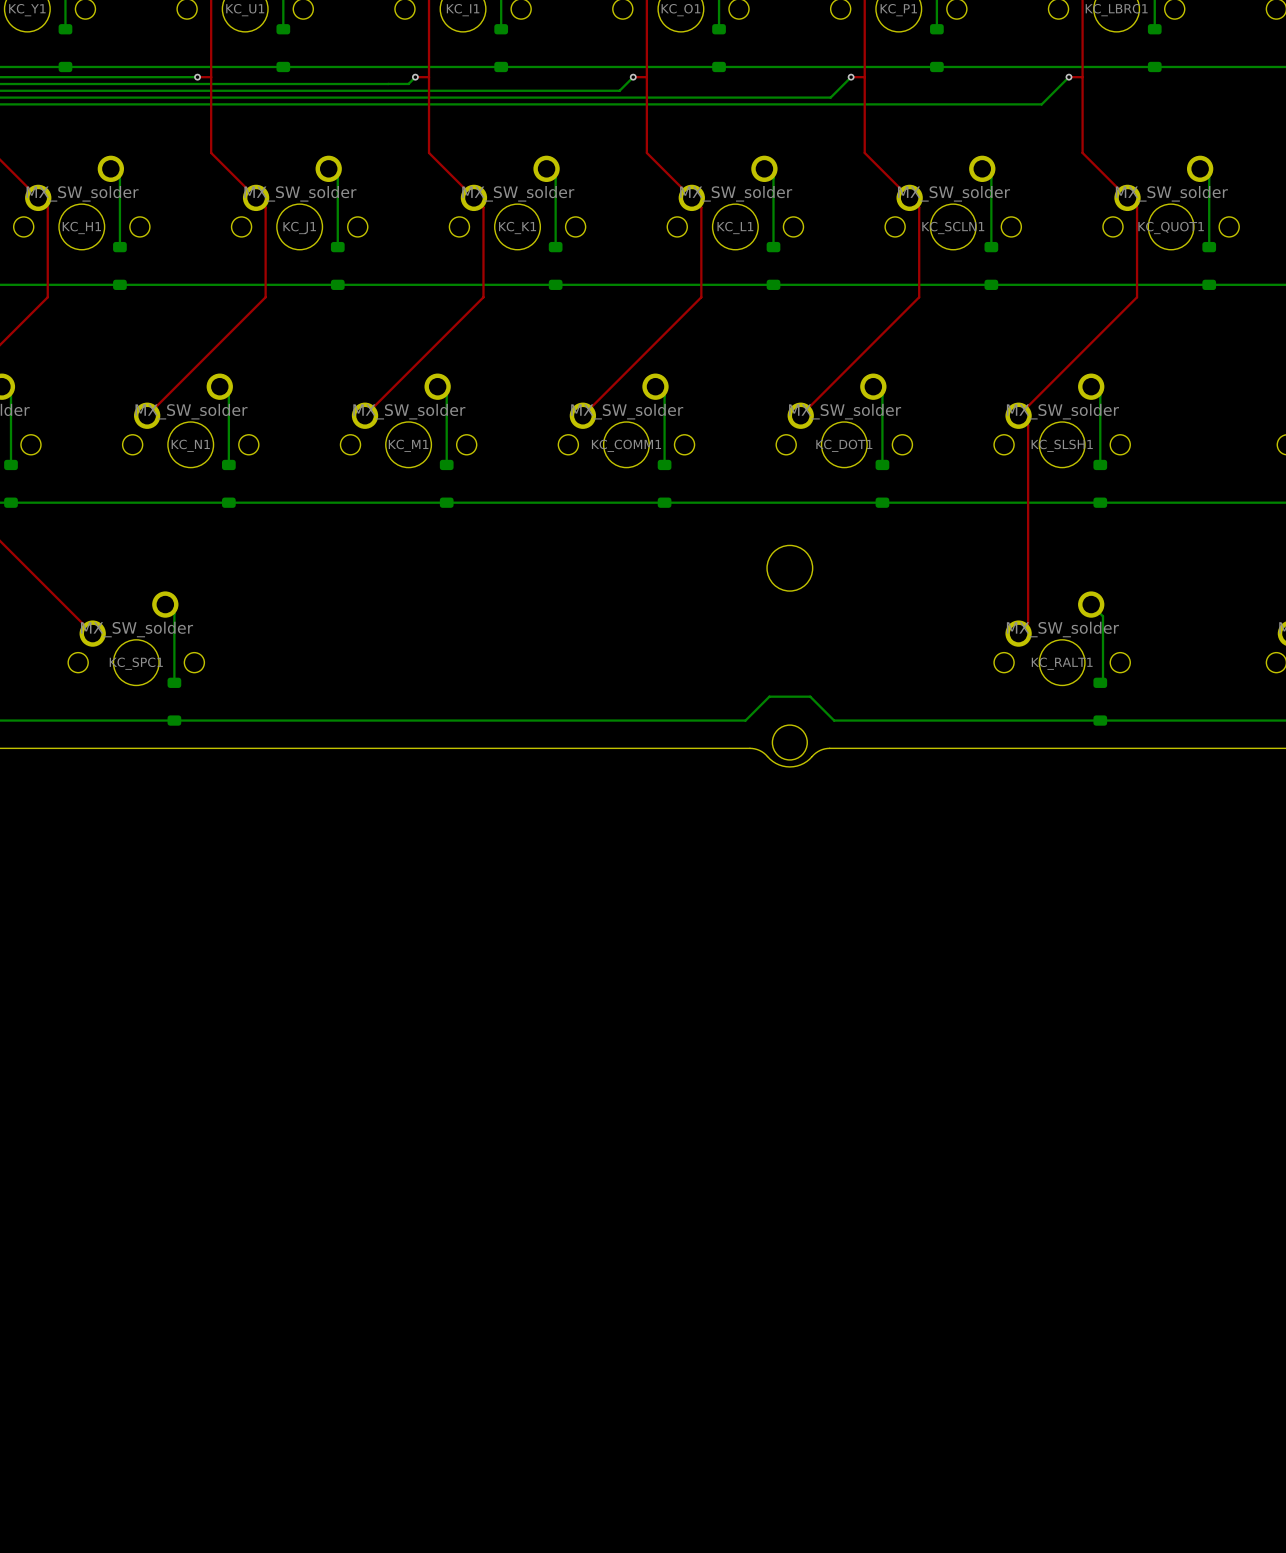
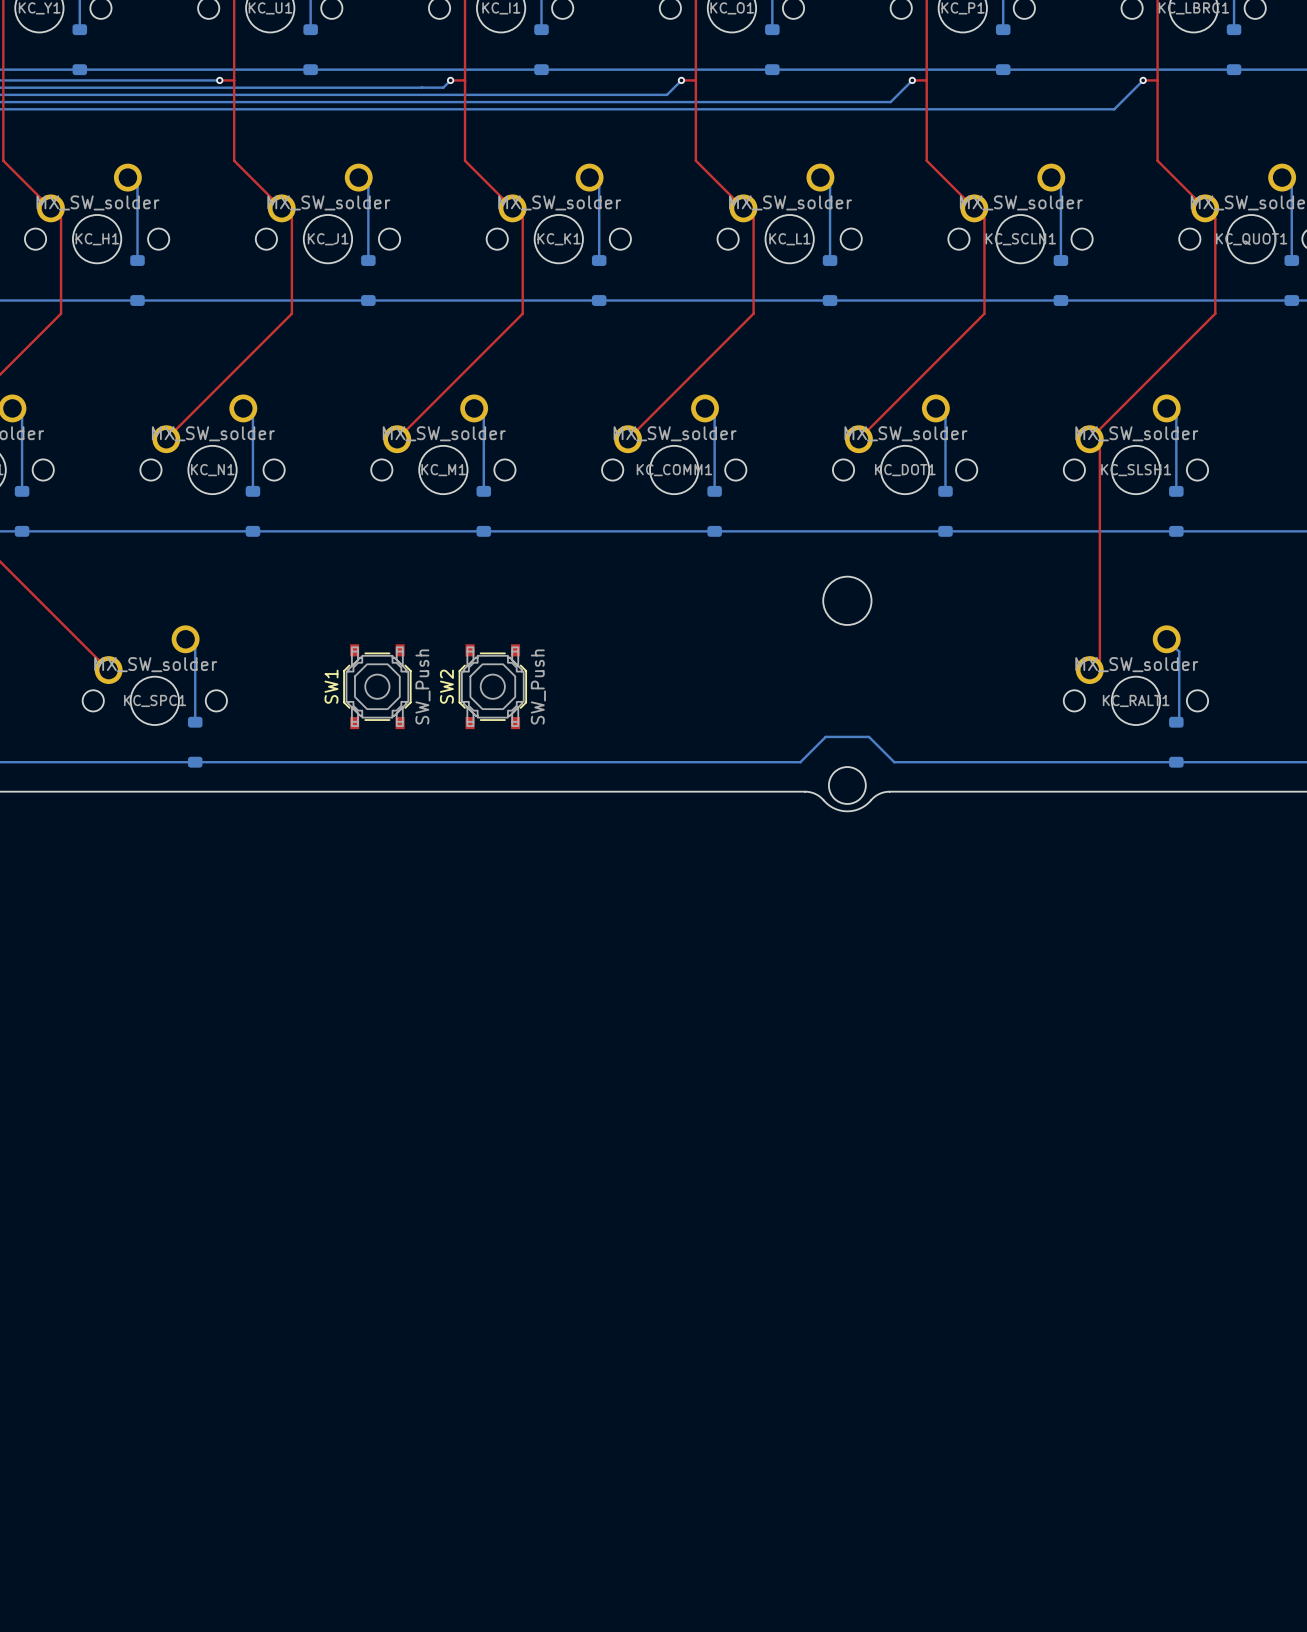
SW1: none -> SW_Push (377, 686)
SW2: none -> SW_Push (492, 686)

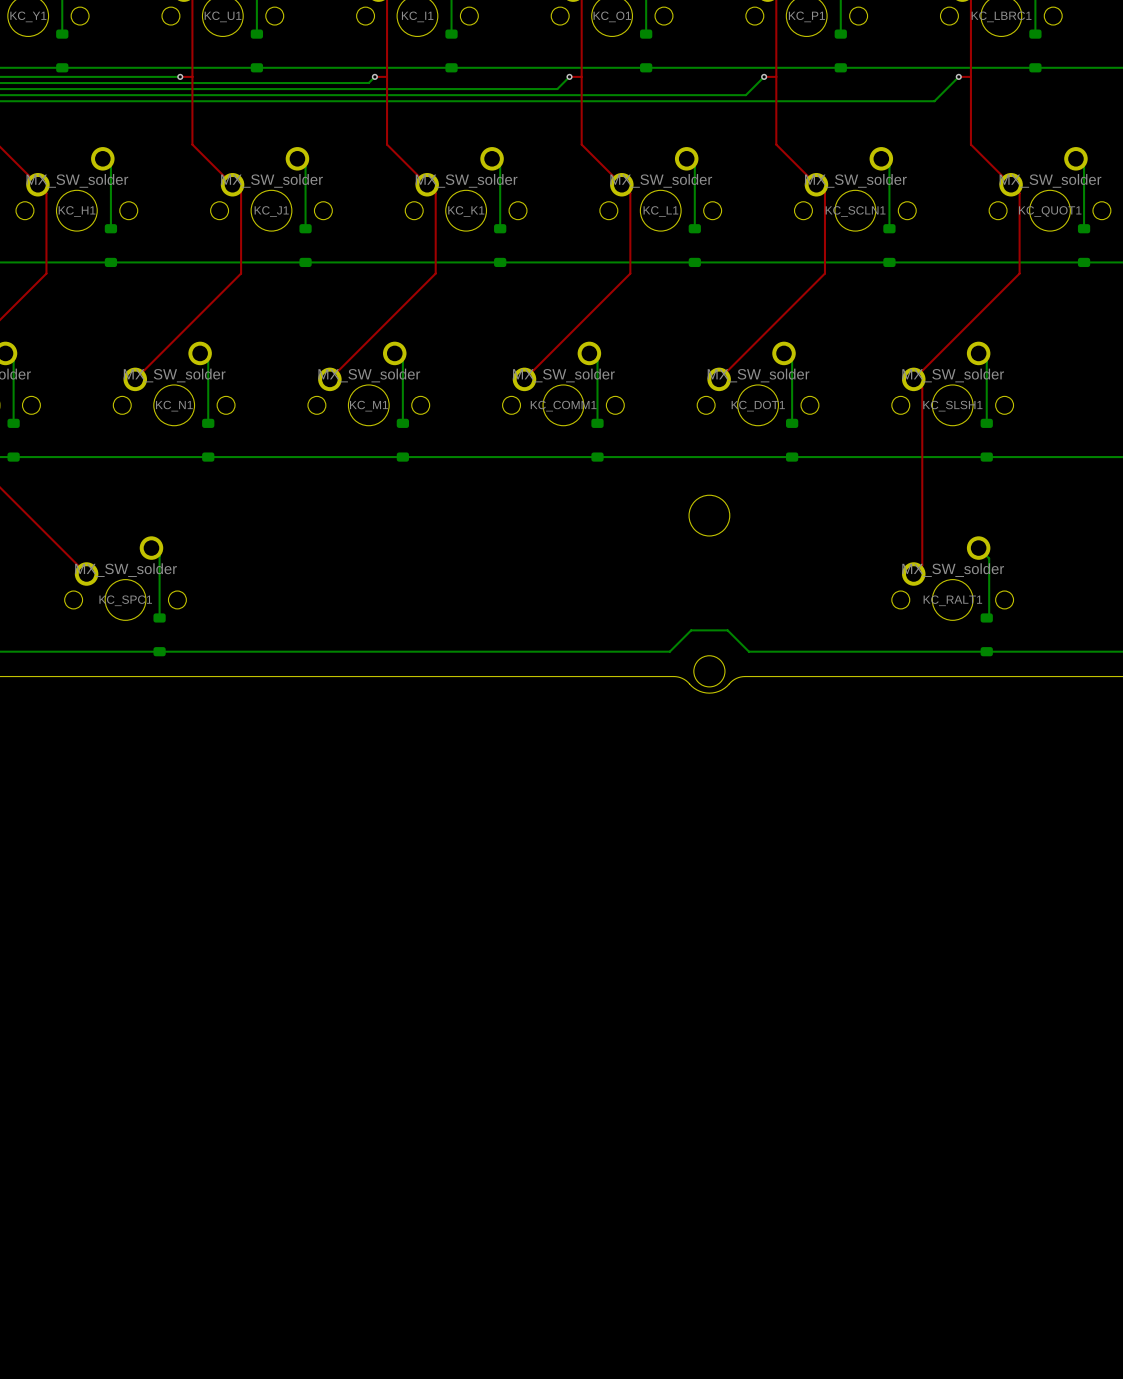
SW1: SW_Push (377, 686) -> none
SW2: SW_Push (492, 686) -> none

